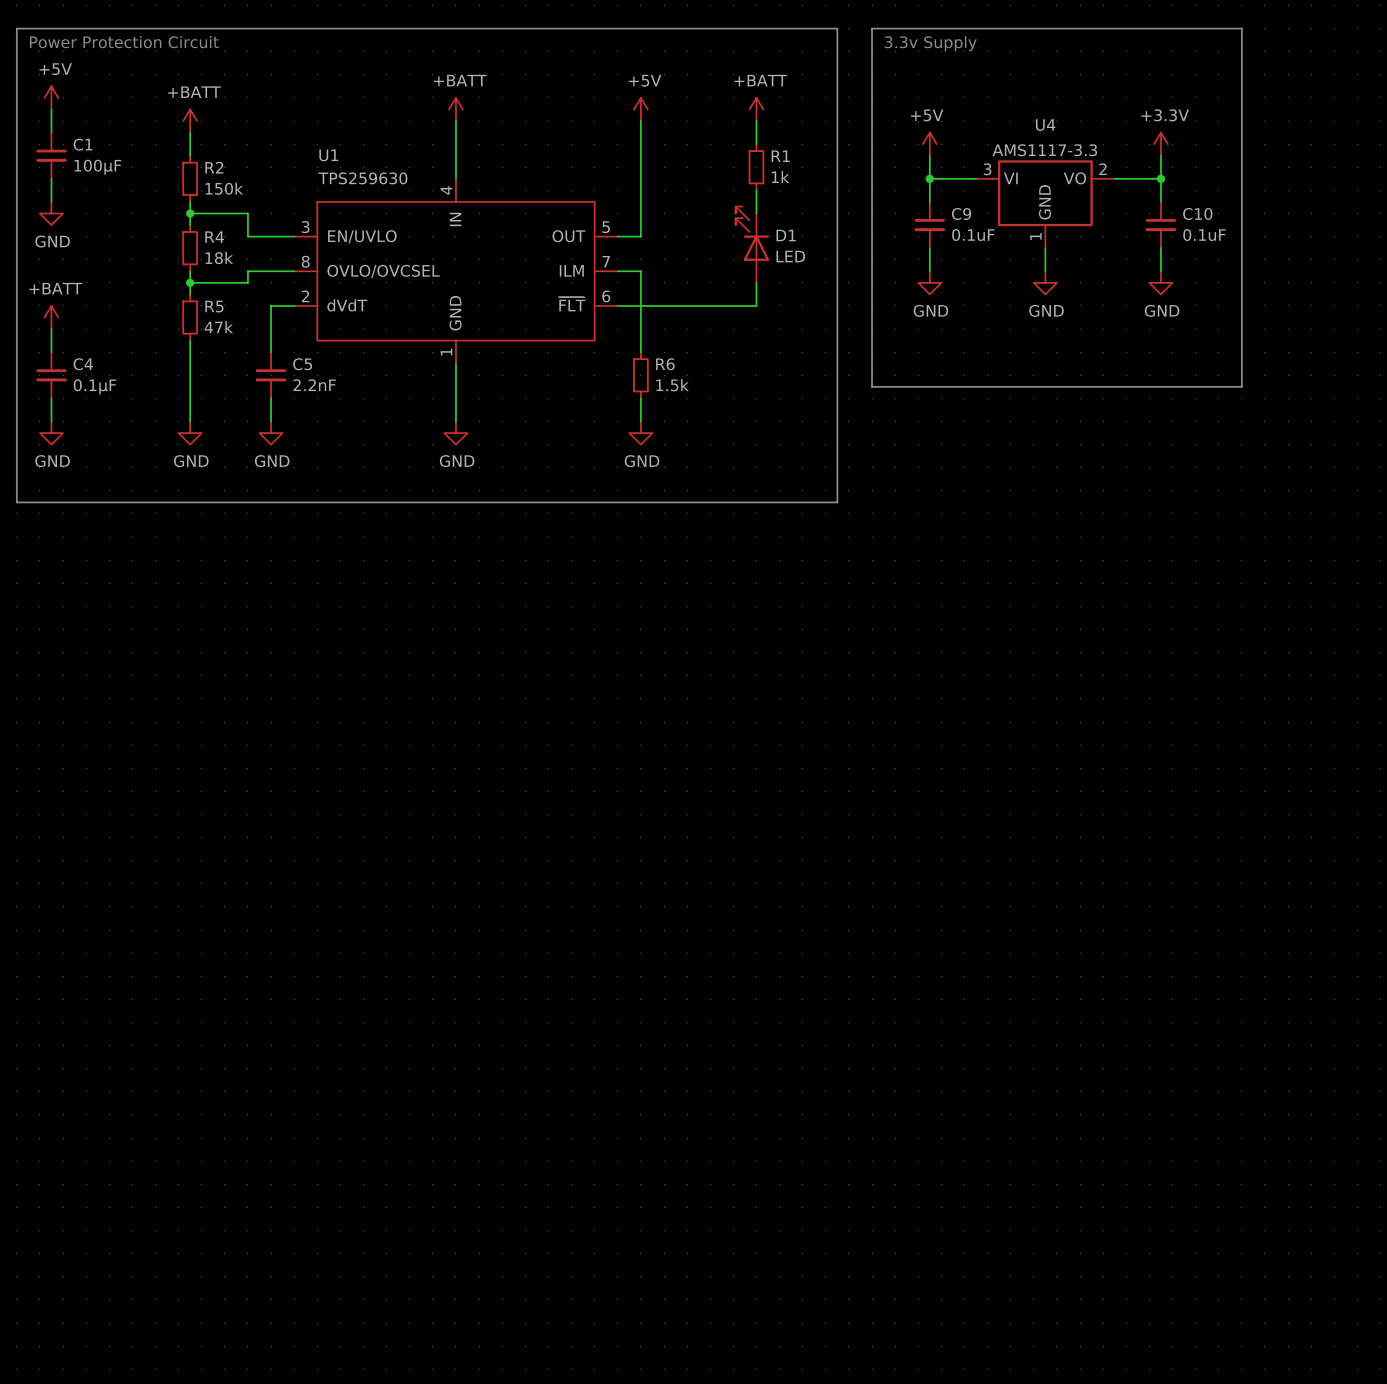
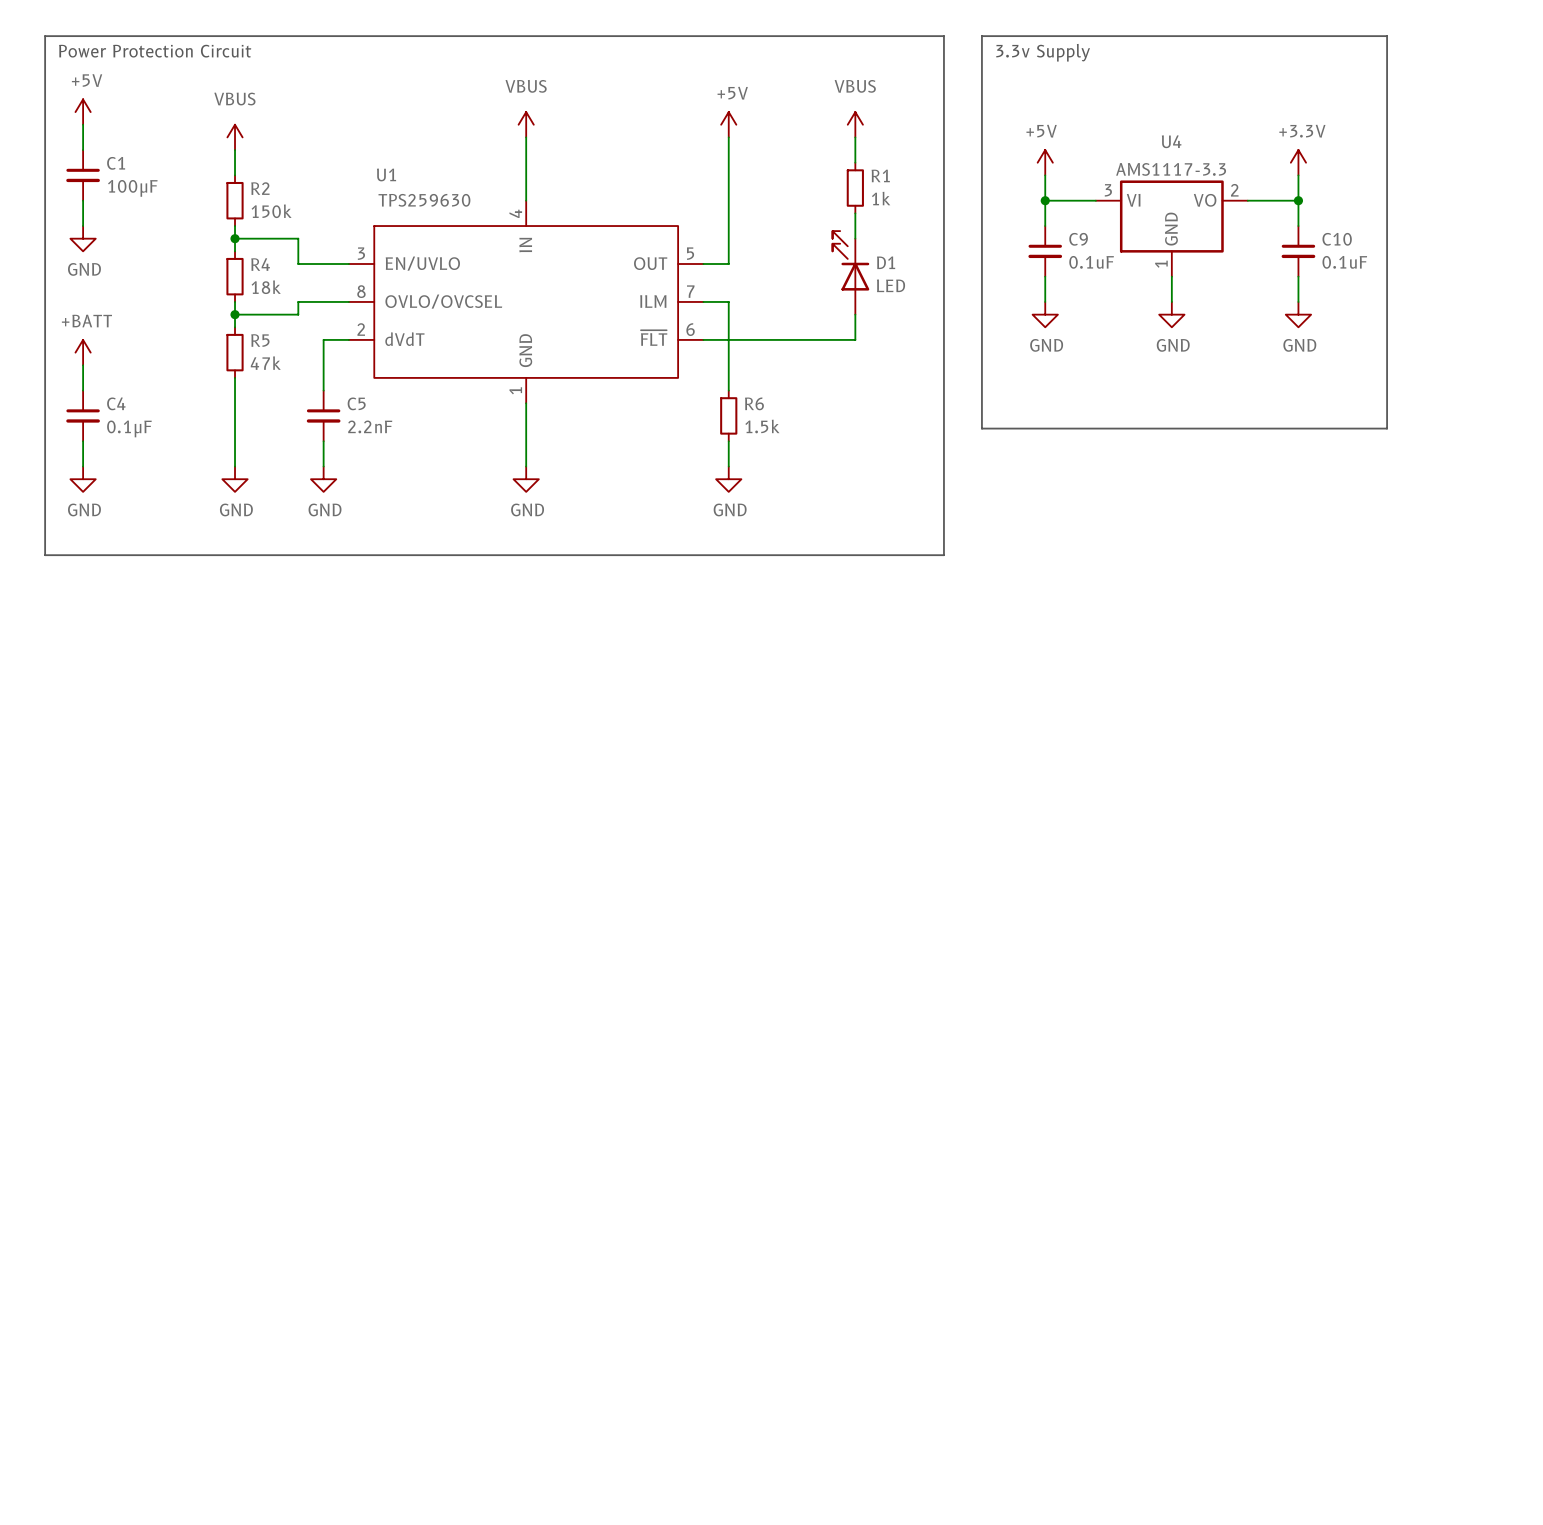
power symbol: +BATT (455, 109) -> VBUS (526, 124)
power symbol: +BATT (756, 109) -> VBUS (855, 124)
power symbol: +BATT (190, 121) -> VBUS (235, 137)

